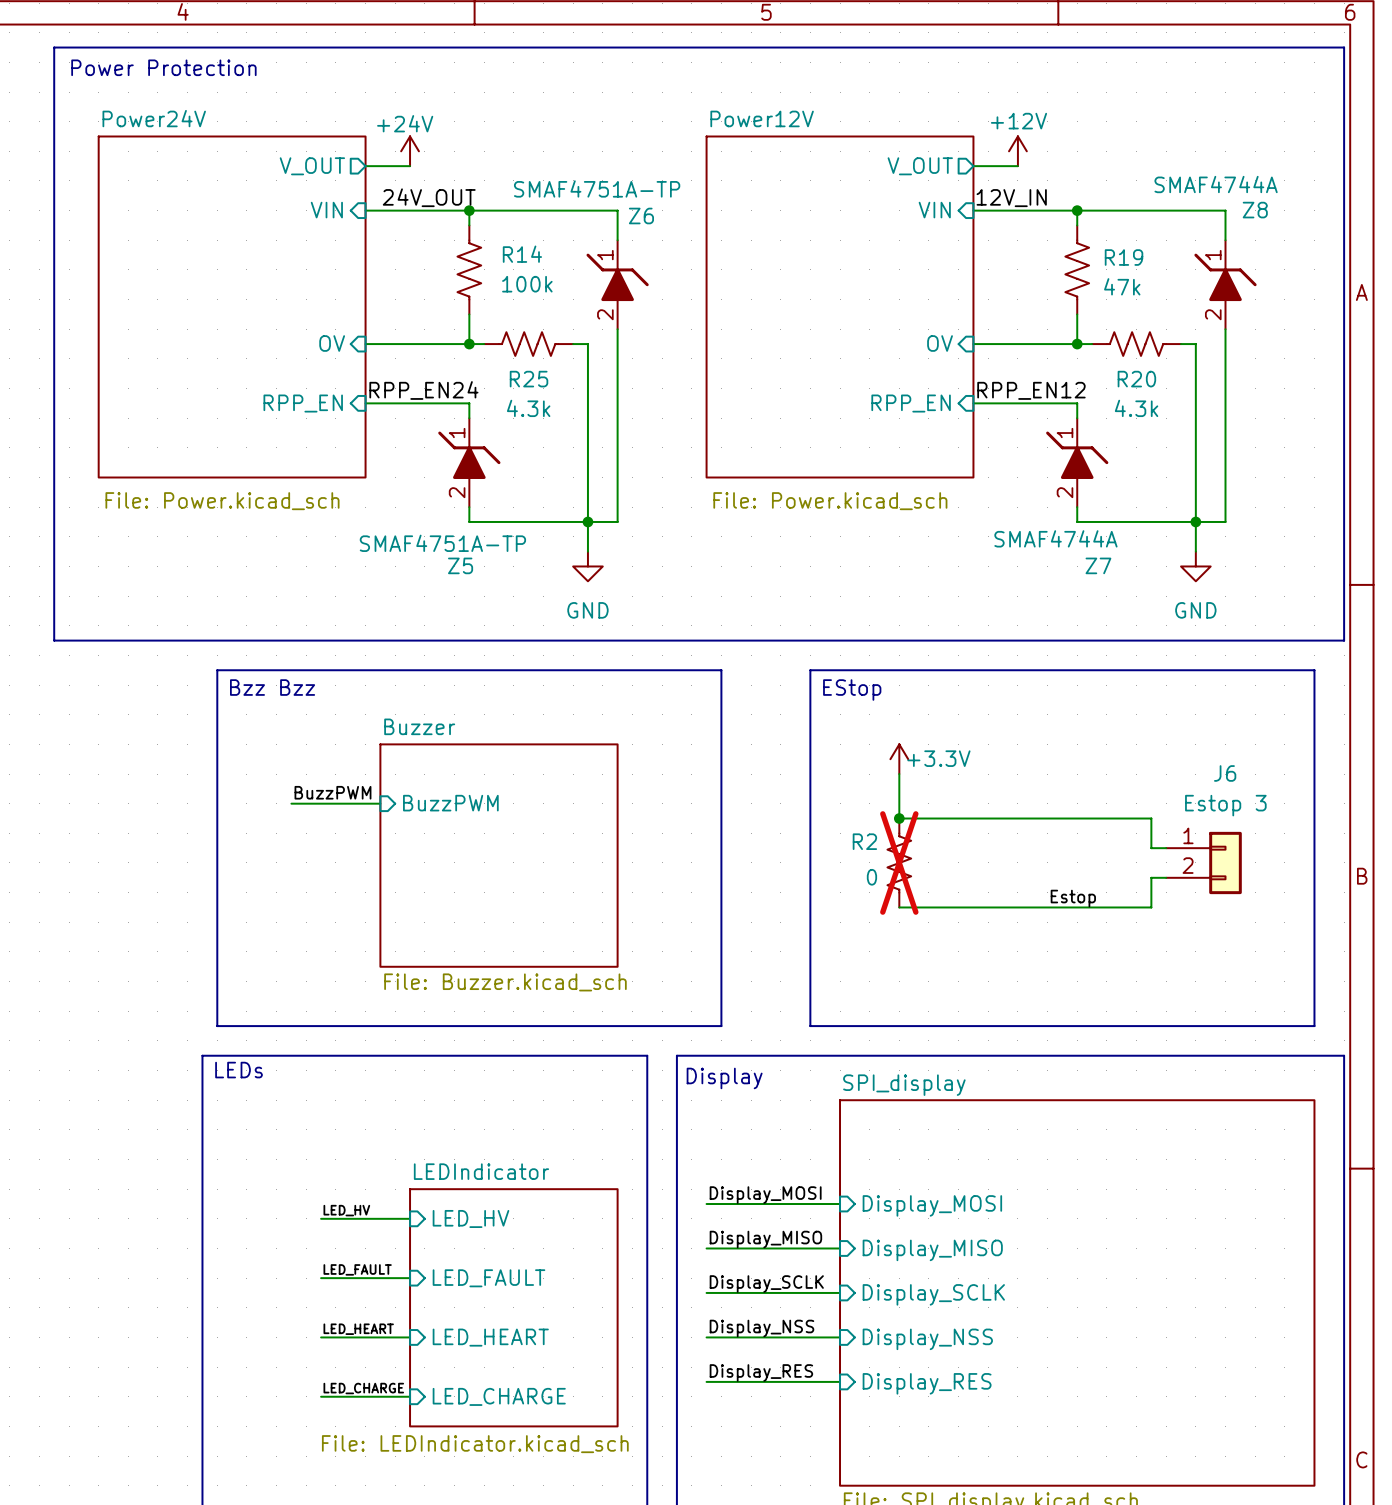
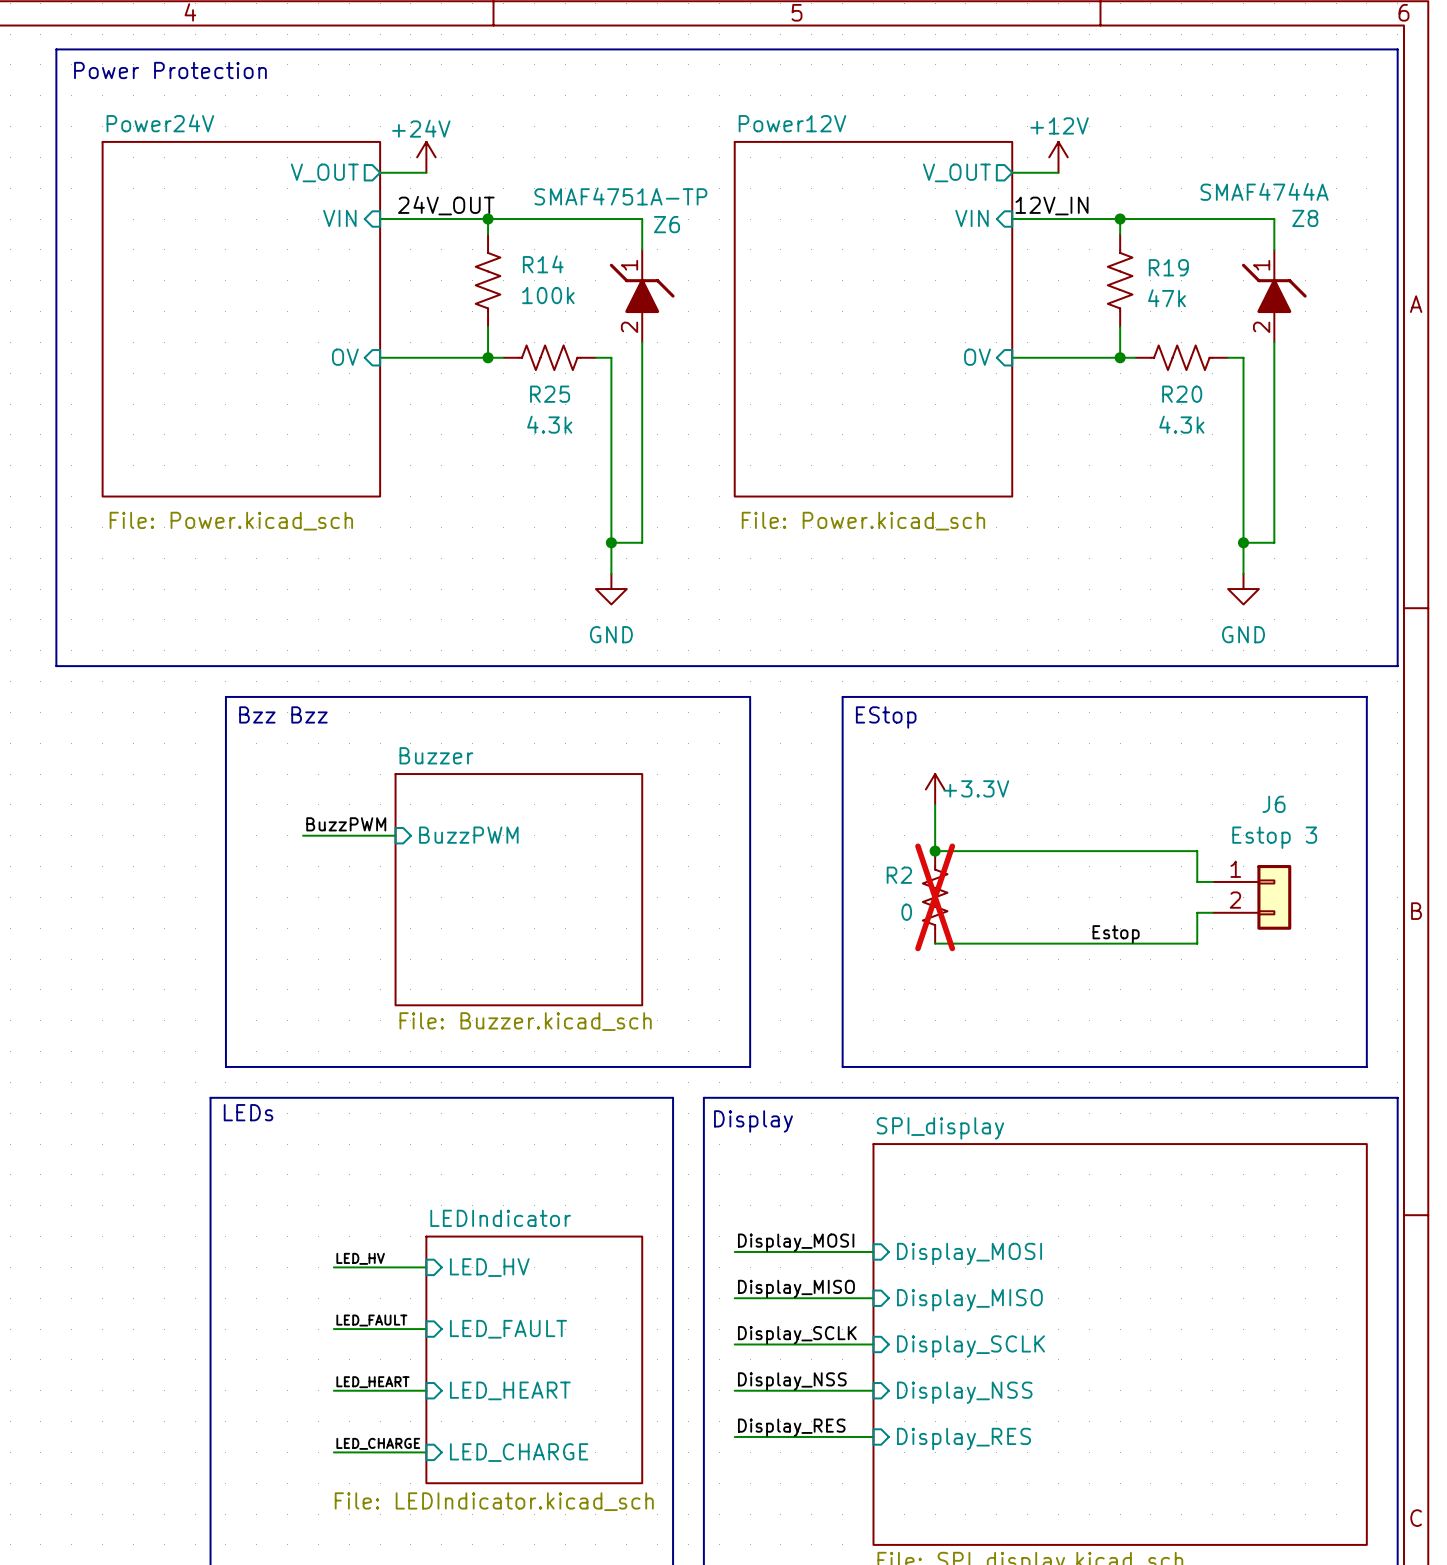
label: RPP_EN24 (423, 390) -> none
label: RPP_EN12 (1031, 390) -> none
sheet pin: RPP_EN (303, 403) -> none
wire: (365, 403) (469, 403) (469, 418) -> none
sheet pin: RPP_EN (911, 403) -> none
wire: (973, 403) (1077, 403) (1077, 418) -> none
Z5: SMAF4751A-TP (469, 462) -> none
Z7: SMAF4744A (1077, 462) -> none
wire: (469, 507) (469, 521) (587, 521) -> none
wire: (1077, 507) (1077, 521) (1195, 521) -> none

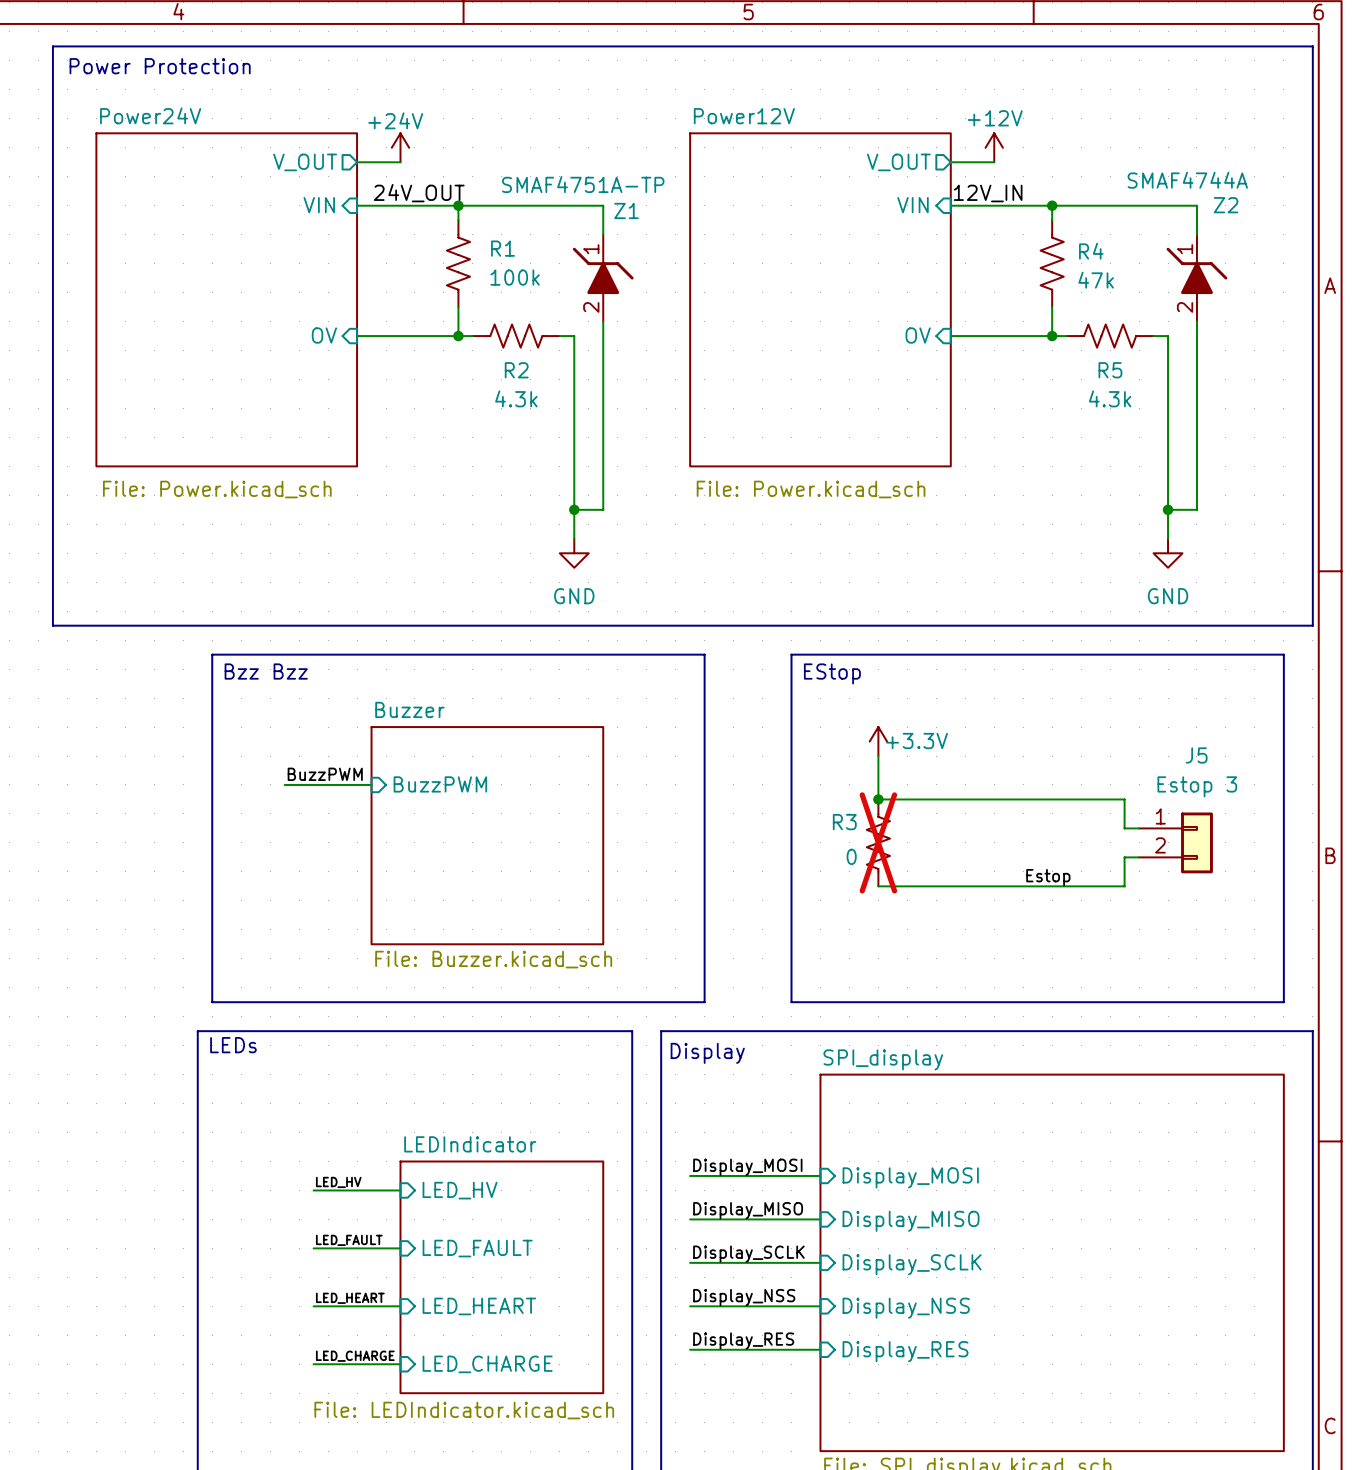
Z8 name: Z8 (1305, 218) -> Z2 (1226, 205)
Z6 name: Z6 (667, 224) -> Z1 (626, 210)
R14 name: R14 (543, 264) -> R1 (503, 248)
R19 name: R19 (1168, 267) -> R4 (1091, 251)
R25 name: R25 (550, 394) -> R2 (516, 370)
R20 name: R20 (1182, 394) -> R5 (1110, 370)
J6 name: J6 (1273, 804) -> J5 (1196, 755)
R2 name: R2 (899, 875) -> R3 (844, 822)

